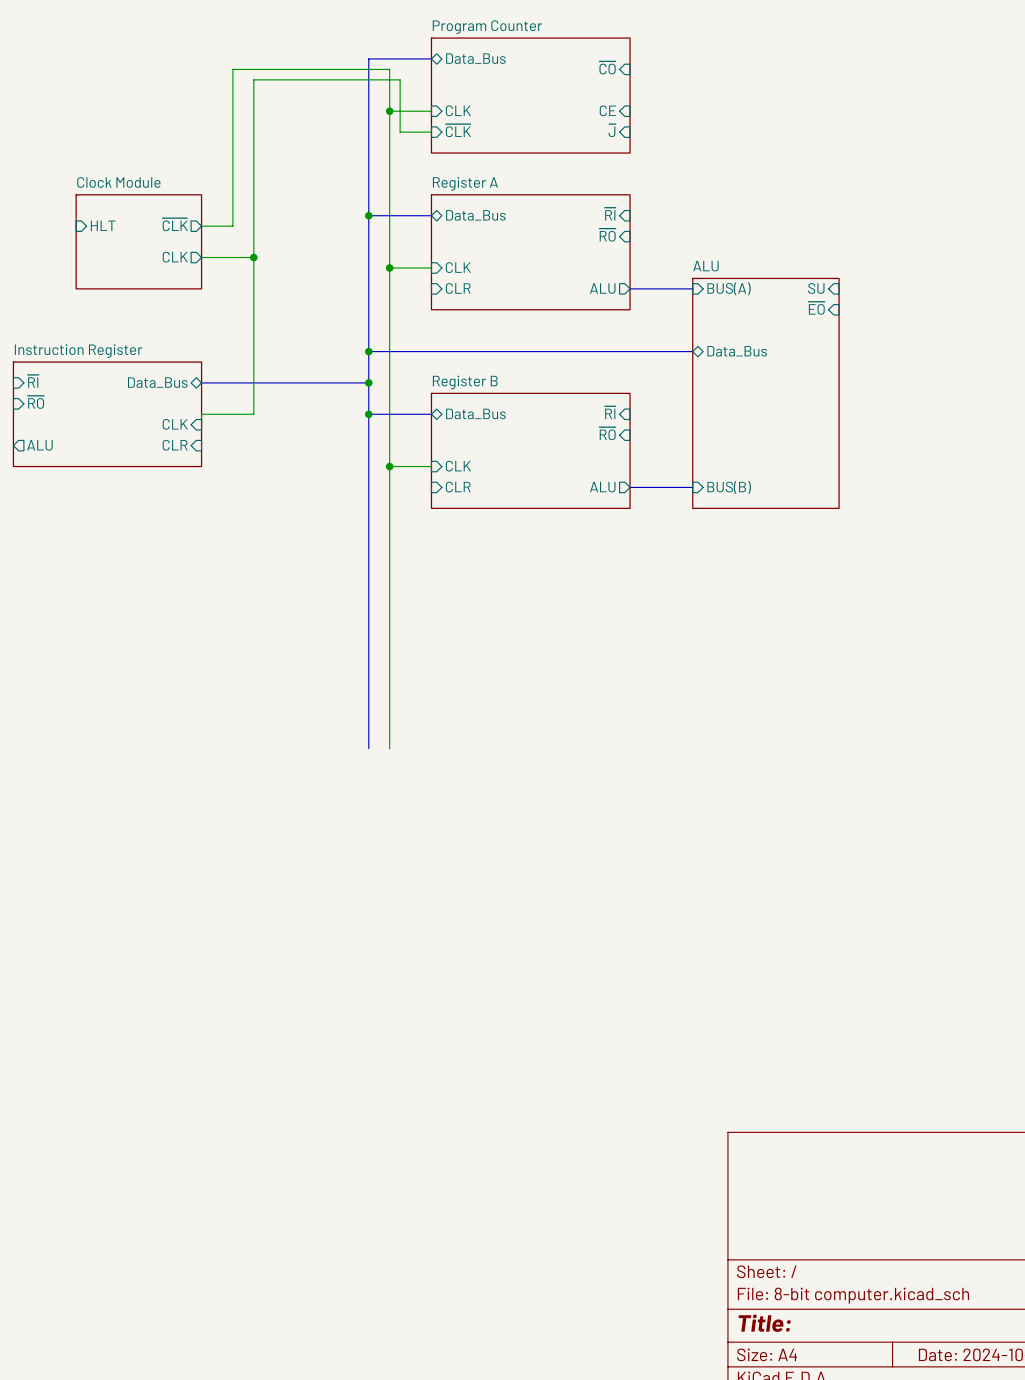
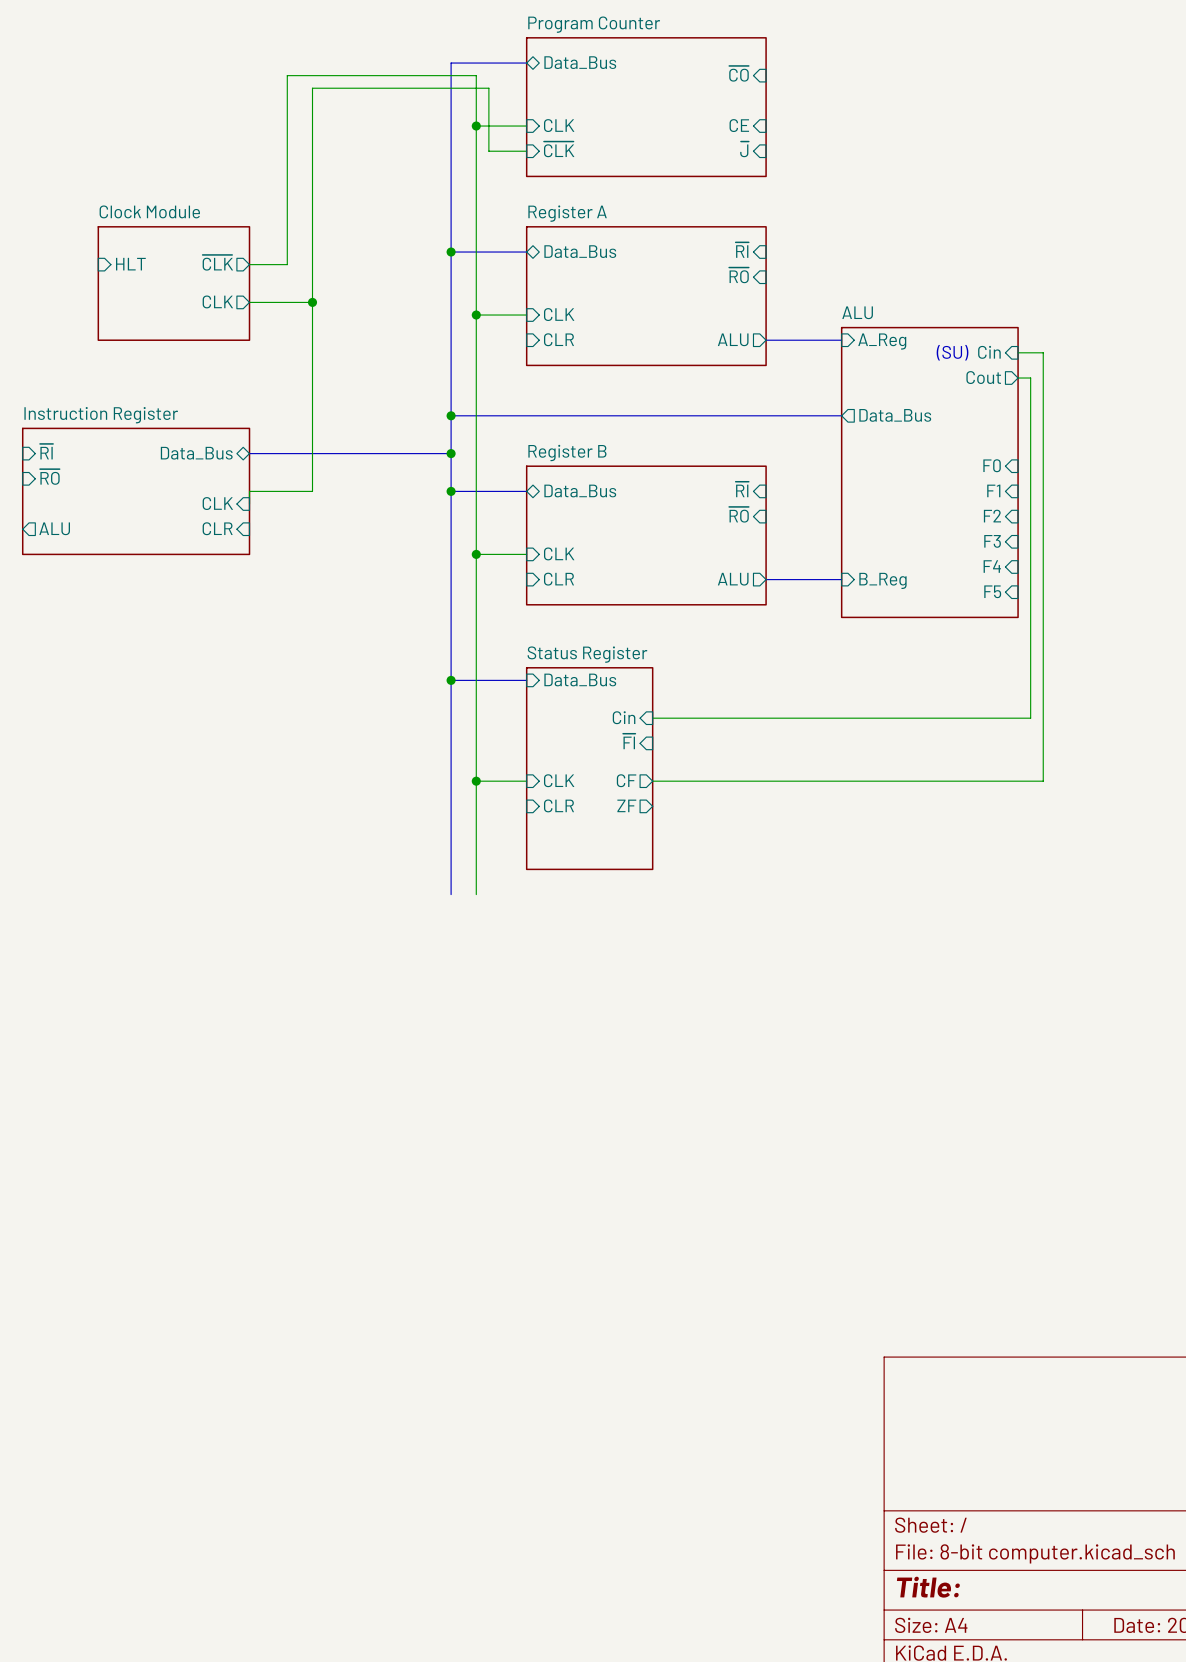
sheet ALU shape: [692, 277, 840, 509] -> [840, 326, 1019, 619]
sheet pin: BUS(A) (729, 288) -> A_Reg (882, 341)
sheet pin: SU (816, 288) -> none
sheet pin: none -> Cin (989, 352)
text: none -> (SU) (952, 352)
wire: none -> (1018, 352) (1043, 352) (1043, 781) (652, 781)
sheet pin: ~{EO} (816, 308) -> none
sheet pin: none -> Cout (983, 377)
wire: none -> (1018, 378) (1030, 378) (1030, 718) (652, 718)
sheet pin shape: bidirectional (737, 351) -> output (895, 415)
sheet pin: none -> F0 (992, 465)
sheet pin: none -> F1 (993, 490)
sheet pin: none -> F2 (992, 516)
sheet pin: none -> F3 (992, 541)
sheet pin: none -> F4 (992, 566)
sheet pin: BUS(B) (729, 487) -> B_Reg (882, 580)
sheet pin: none -> F5 (992, 591)
sheet pin: none -> Data_Bus (580, 679)
bus: none -> (451, 680) (526, 680)
junction: none -> (451, 680)
sheet pin: none -> Cin (624, 717)
sheet pin: none -> ~{FI} (629, 741)
sheet Status Register: none -> (589, 768)
wire: none -> (476, 781) (526, 781)
junction: none -> (476, 781)
sheet pin: none -> CLK (559, 780)
sheet pin: none -> CF (626, 780)
sheet pin: none -> CLR (558, 805)
sheet pin: none -> ZF (626, 805)

